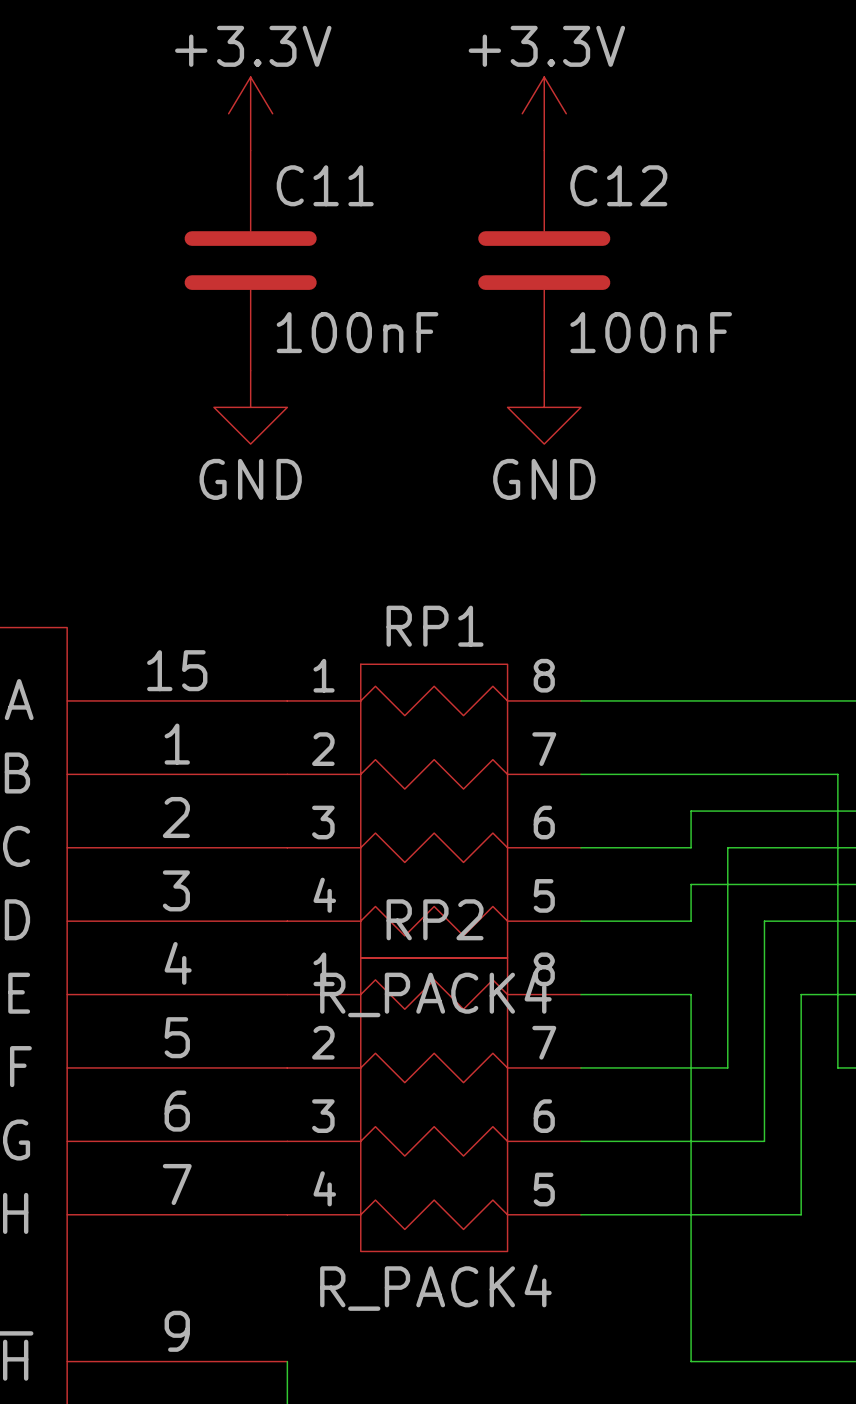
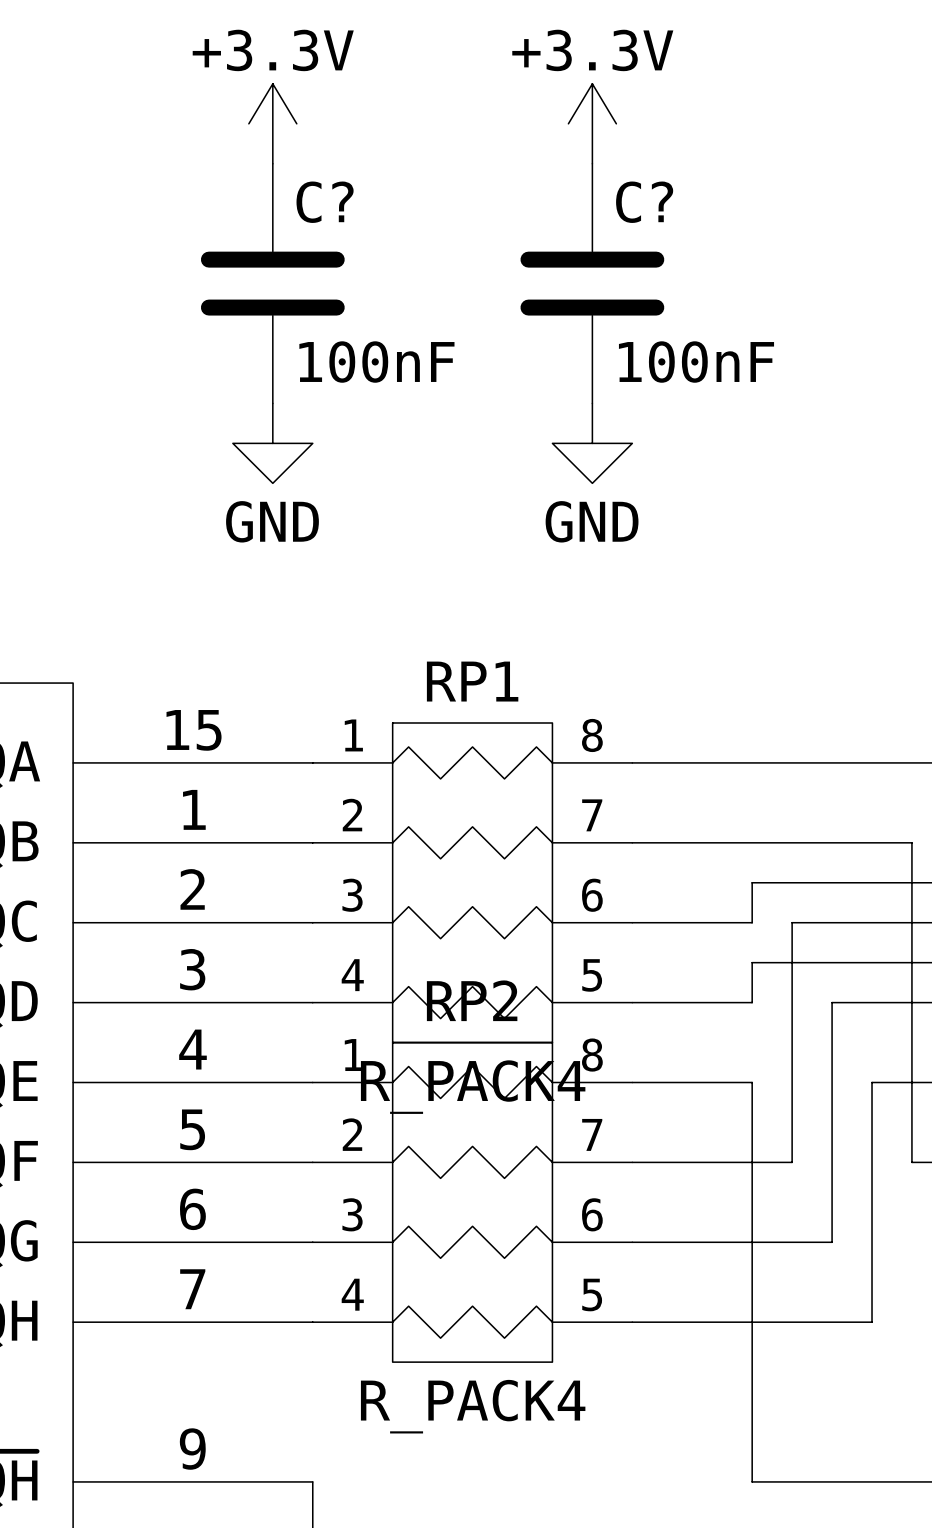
C11 name: C11 (325, 185) -> C? (325, 202)
C12 name: C12 (618, 185) -> C? (644, 202)

